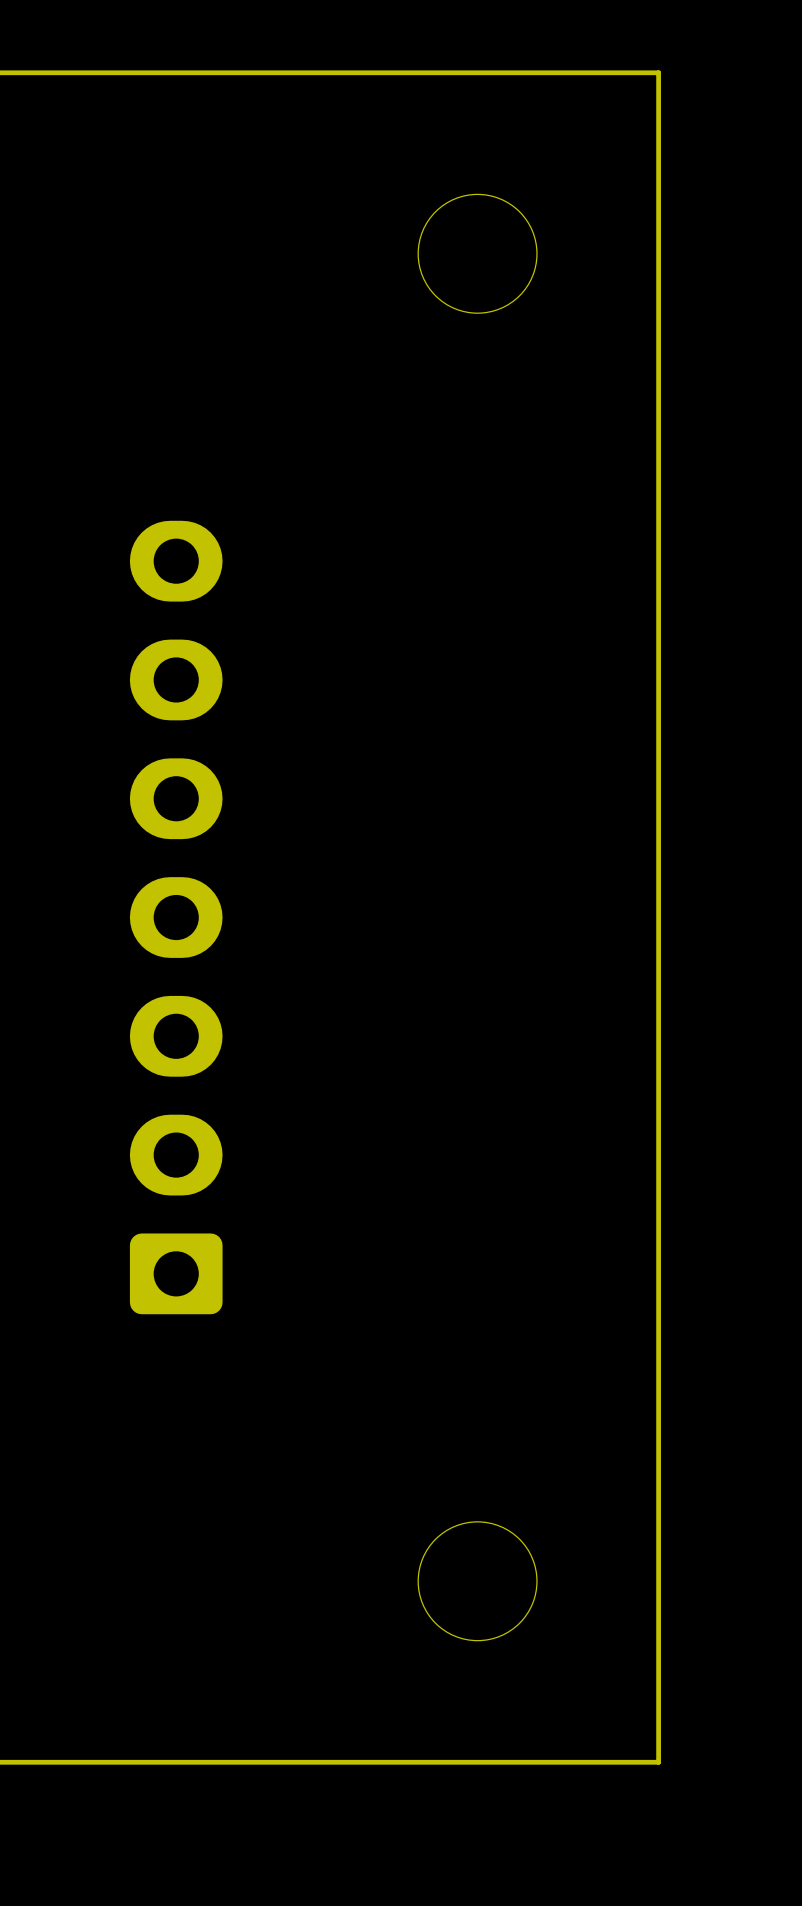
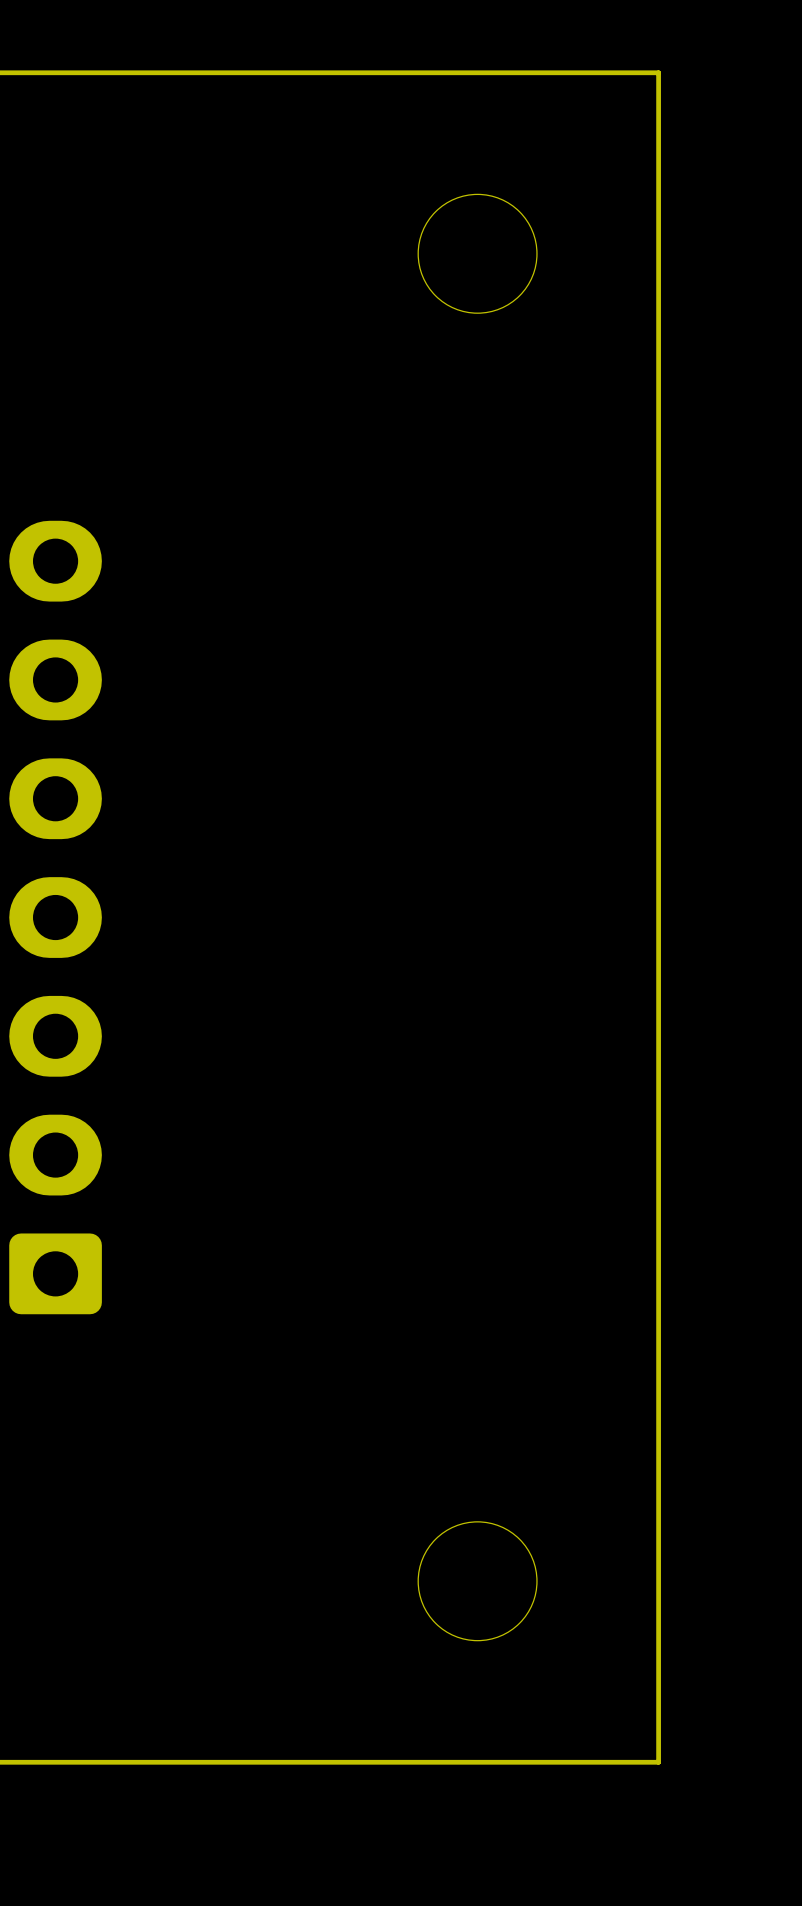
part position: (176, 917) -> (55, 917)

